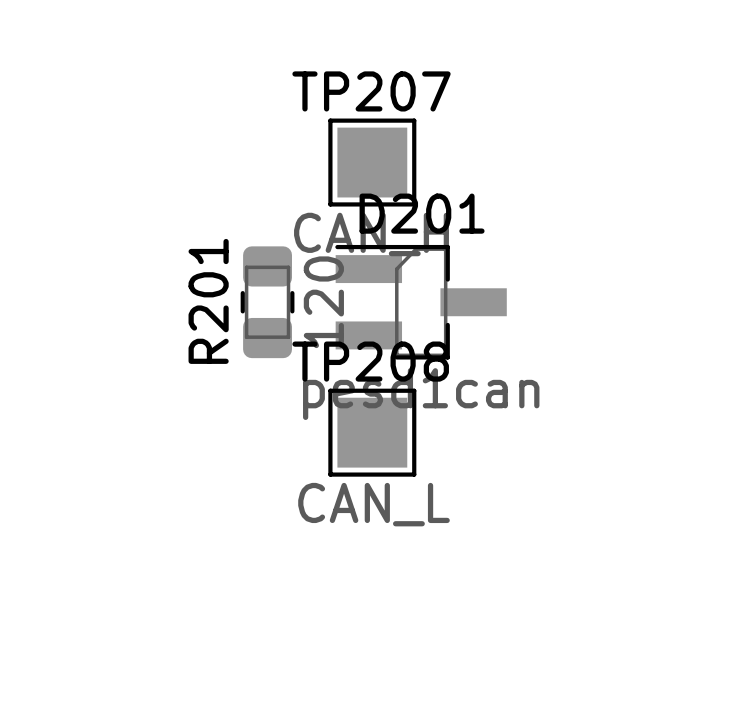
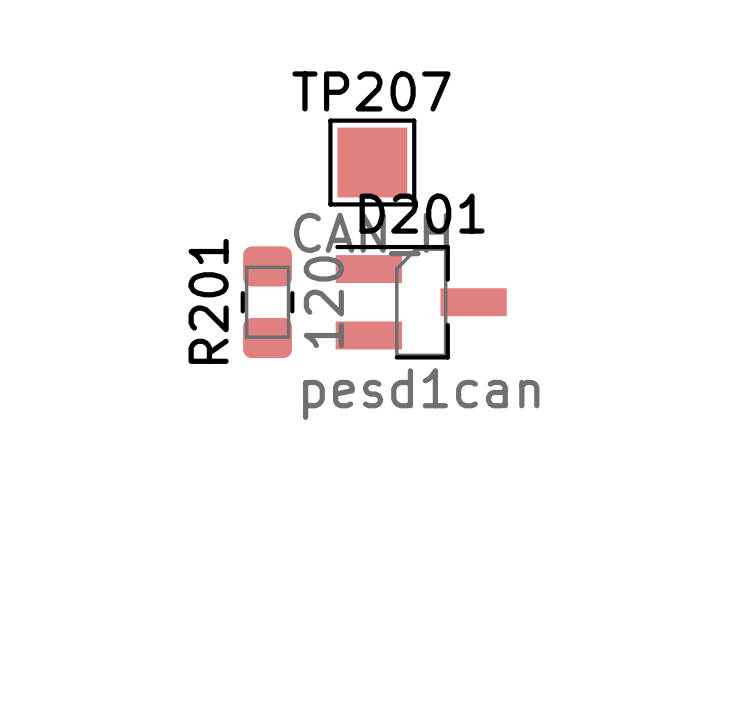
TP208: CAN_L (372, 432) -> none

